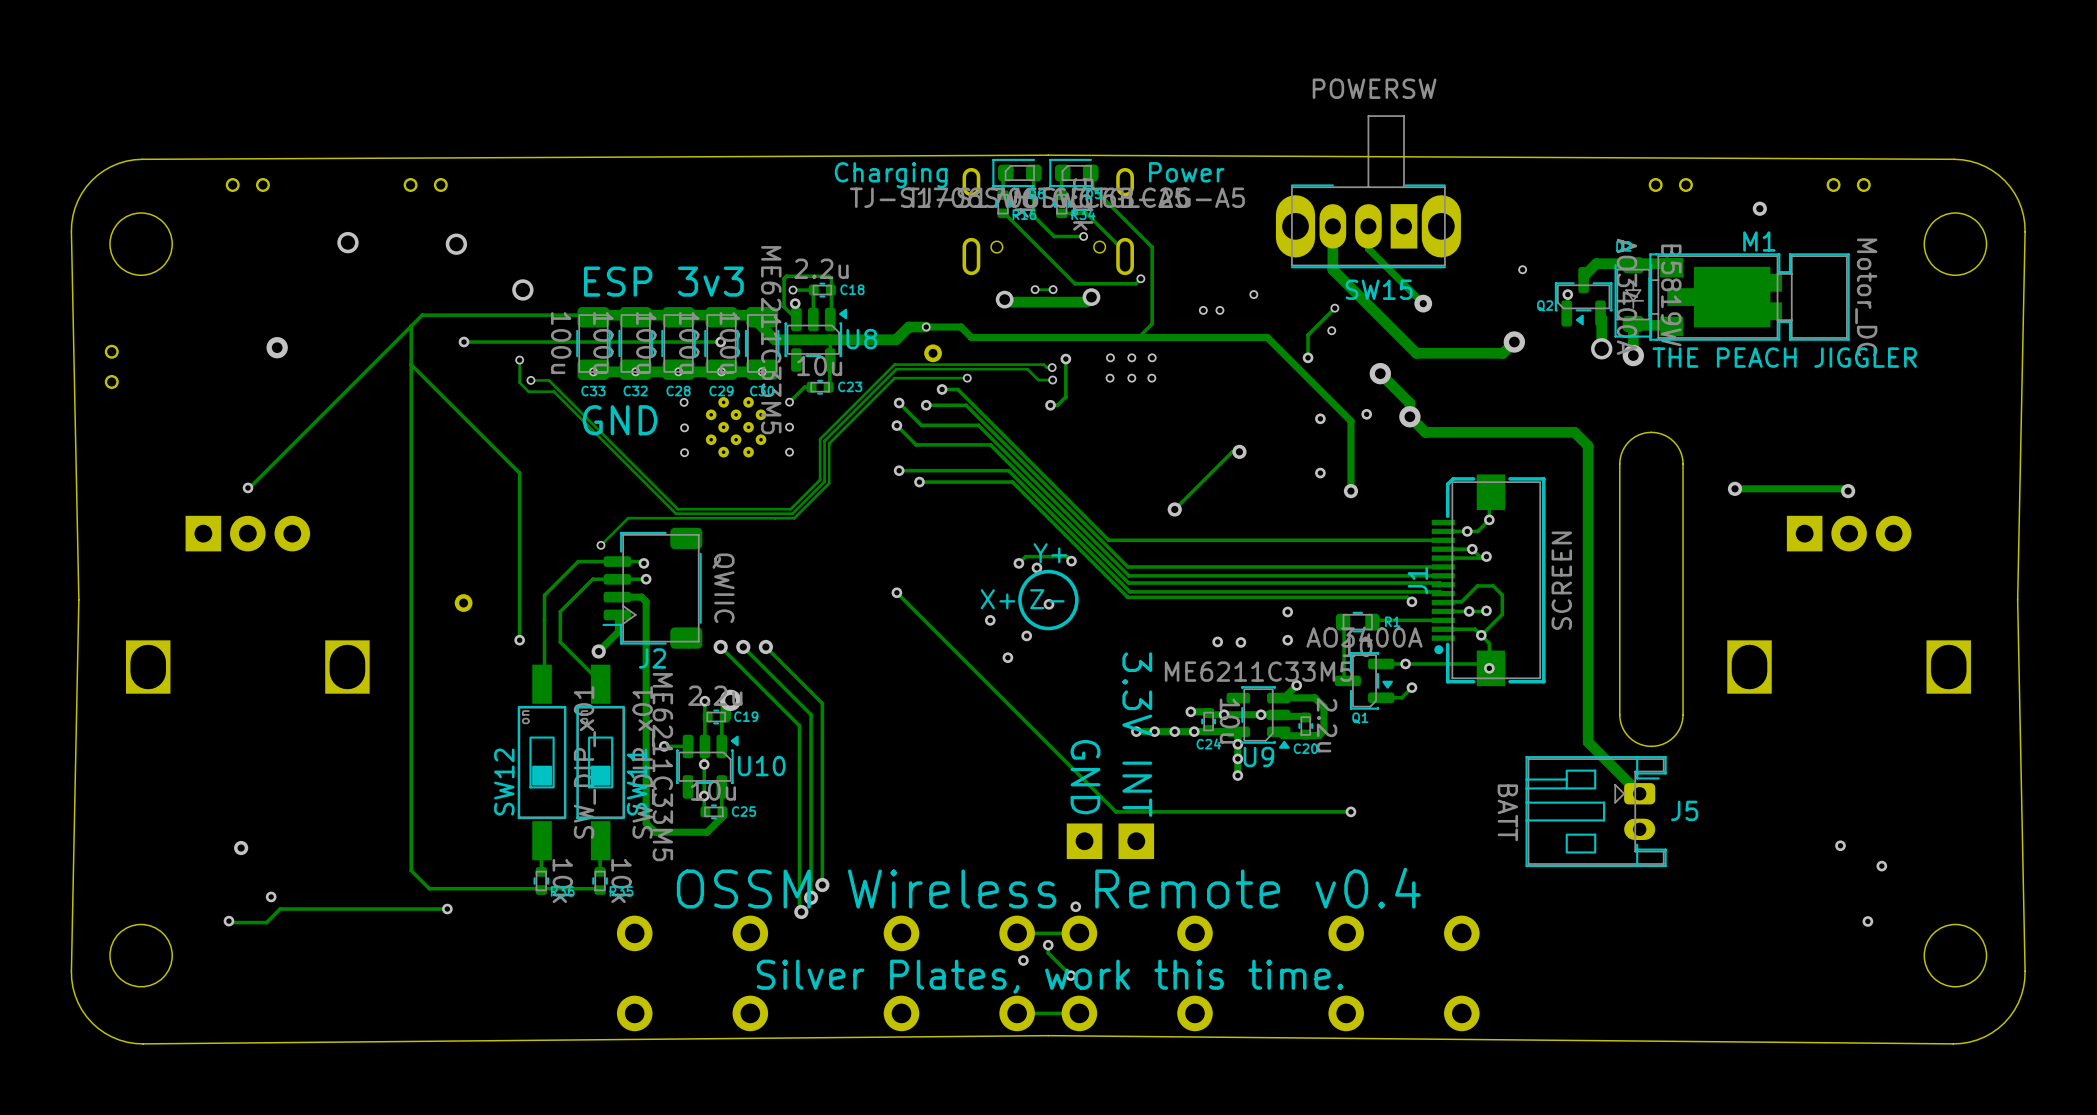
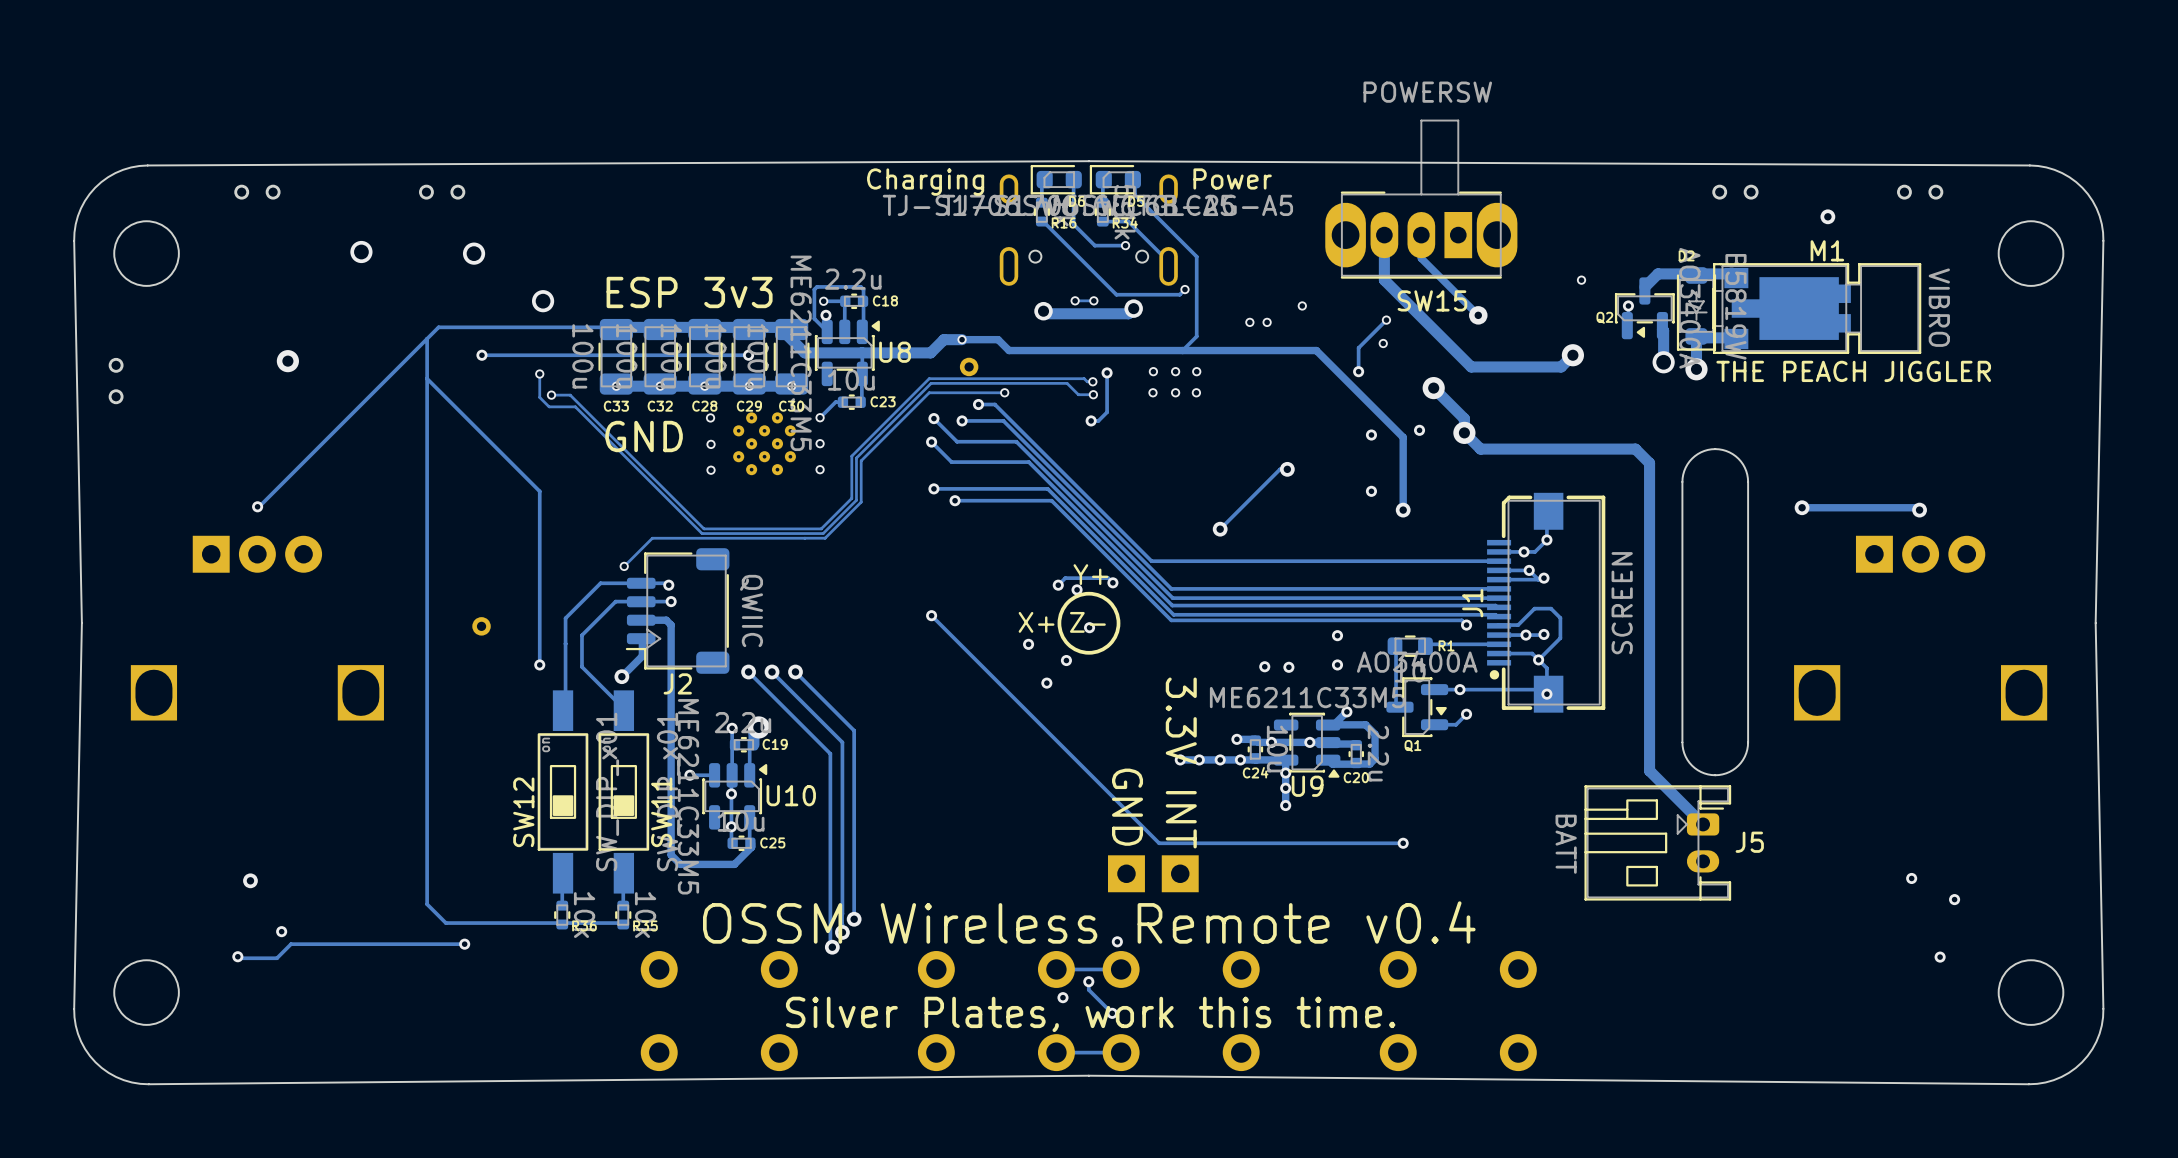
M1 value: Motor_DC (1866, 297) -> VIBRO (1939, 307)

